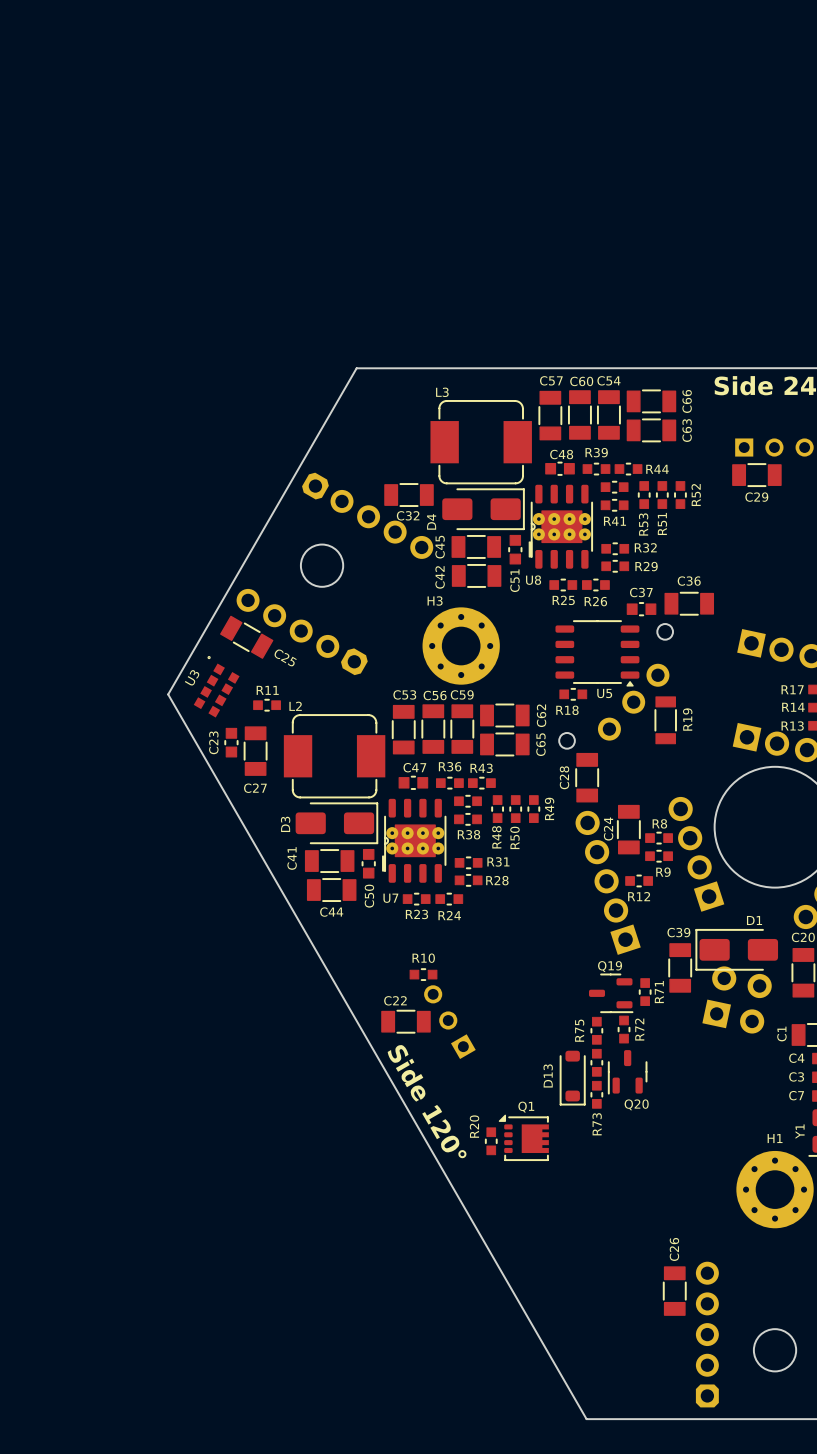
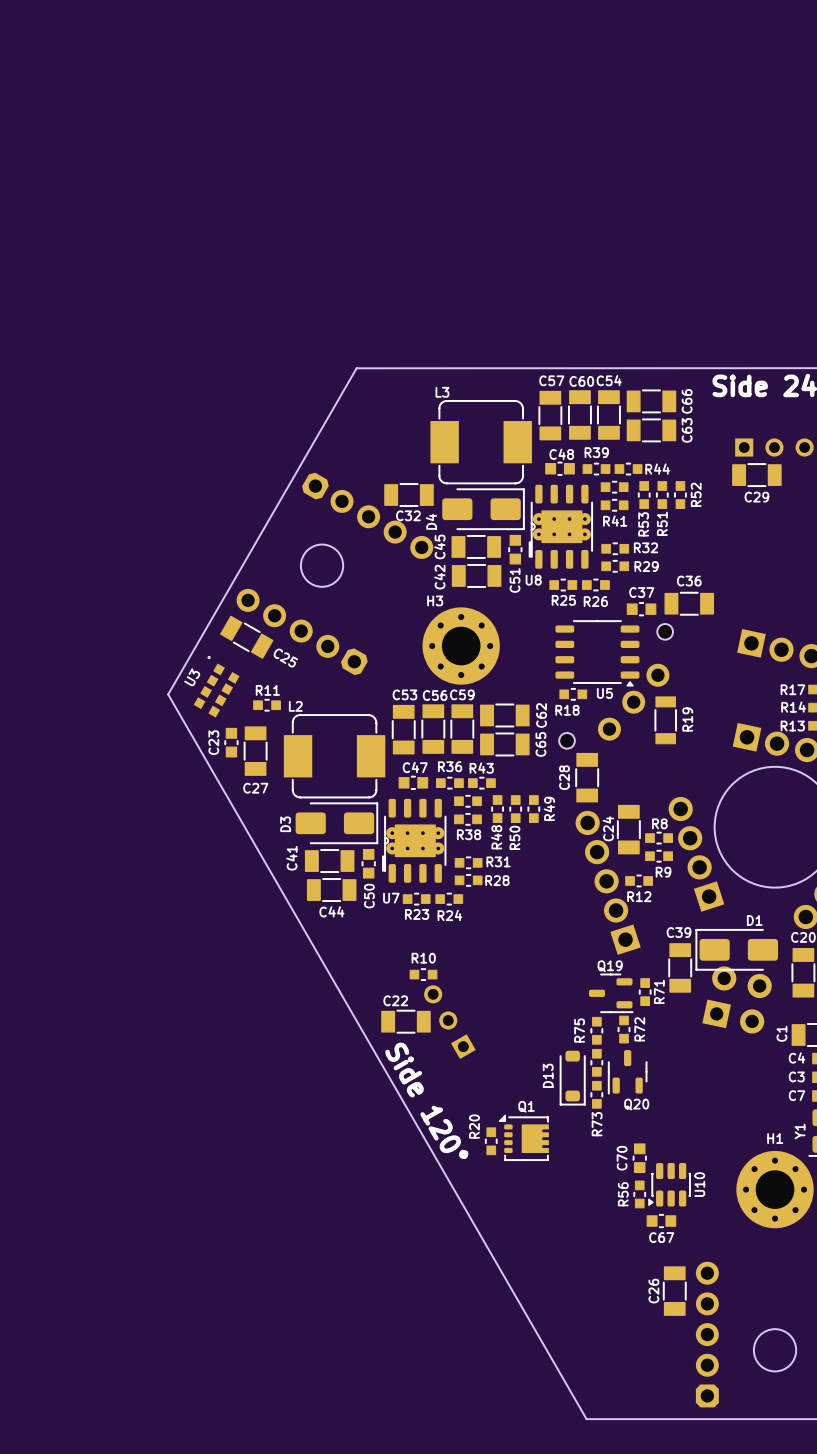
C70: none -> (639, 1158)
U10: none -> (669, 1184)
R56: none -> (639, 1194)
C67: none -> (661, 1221)
C26 name position: C26 (674, 1249) -> C26 (653, 1291)

